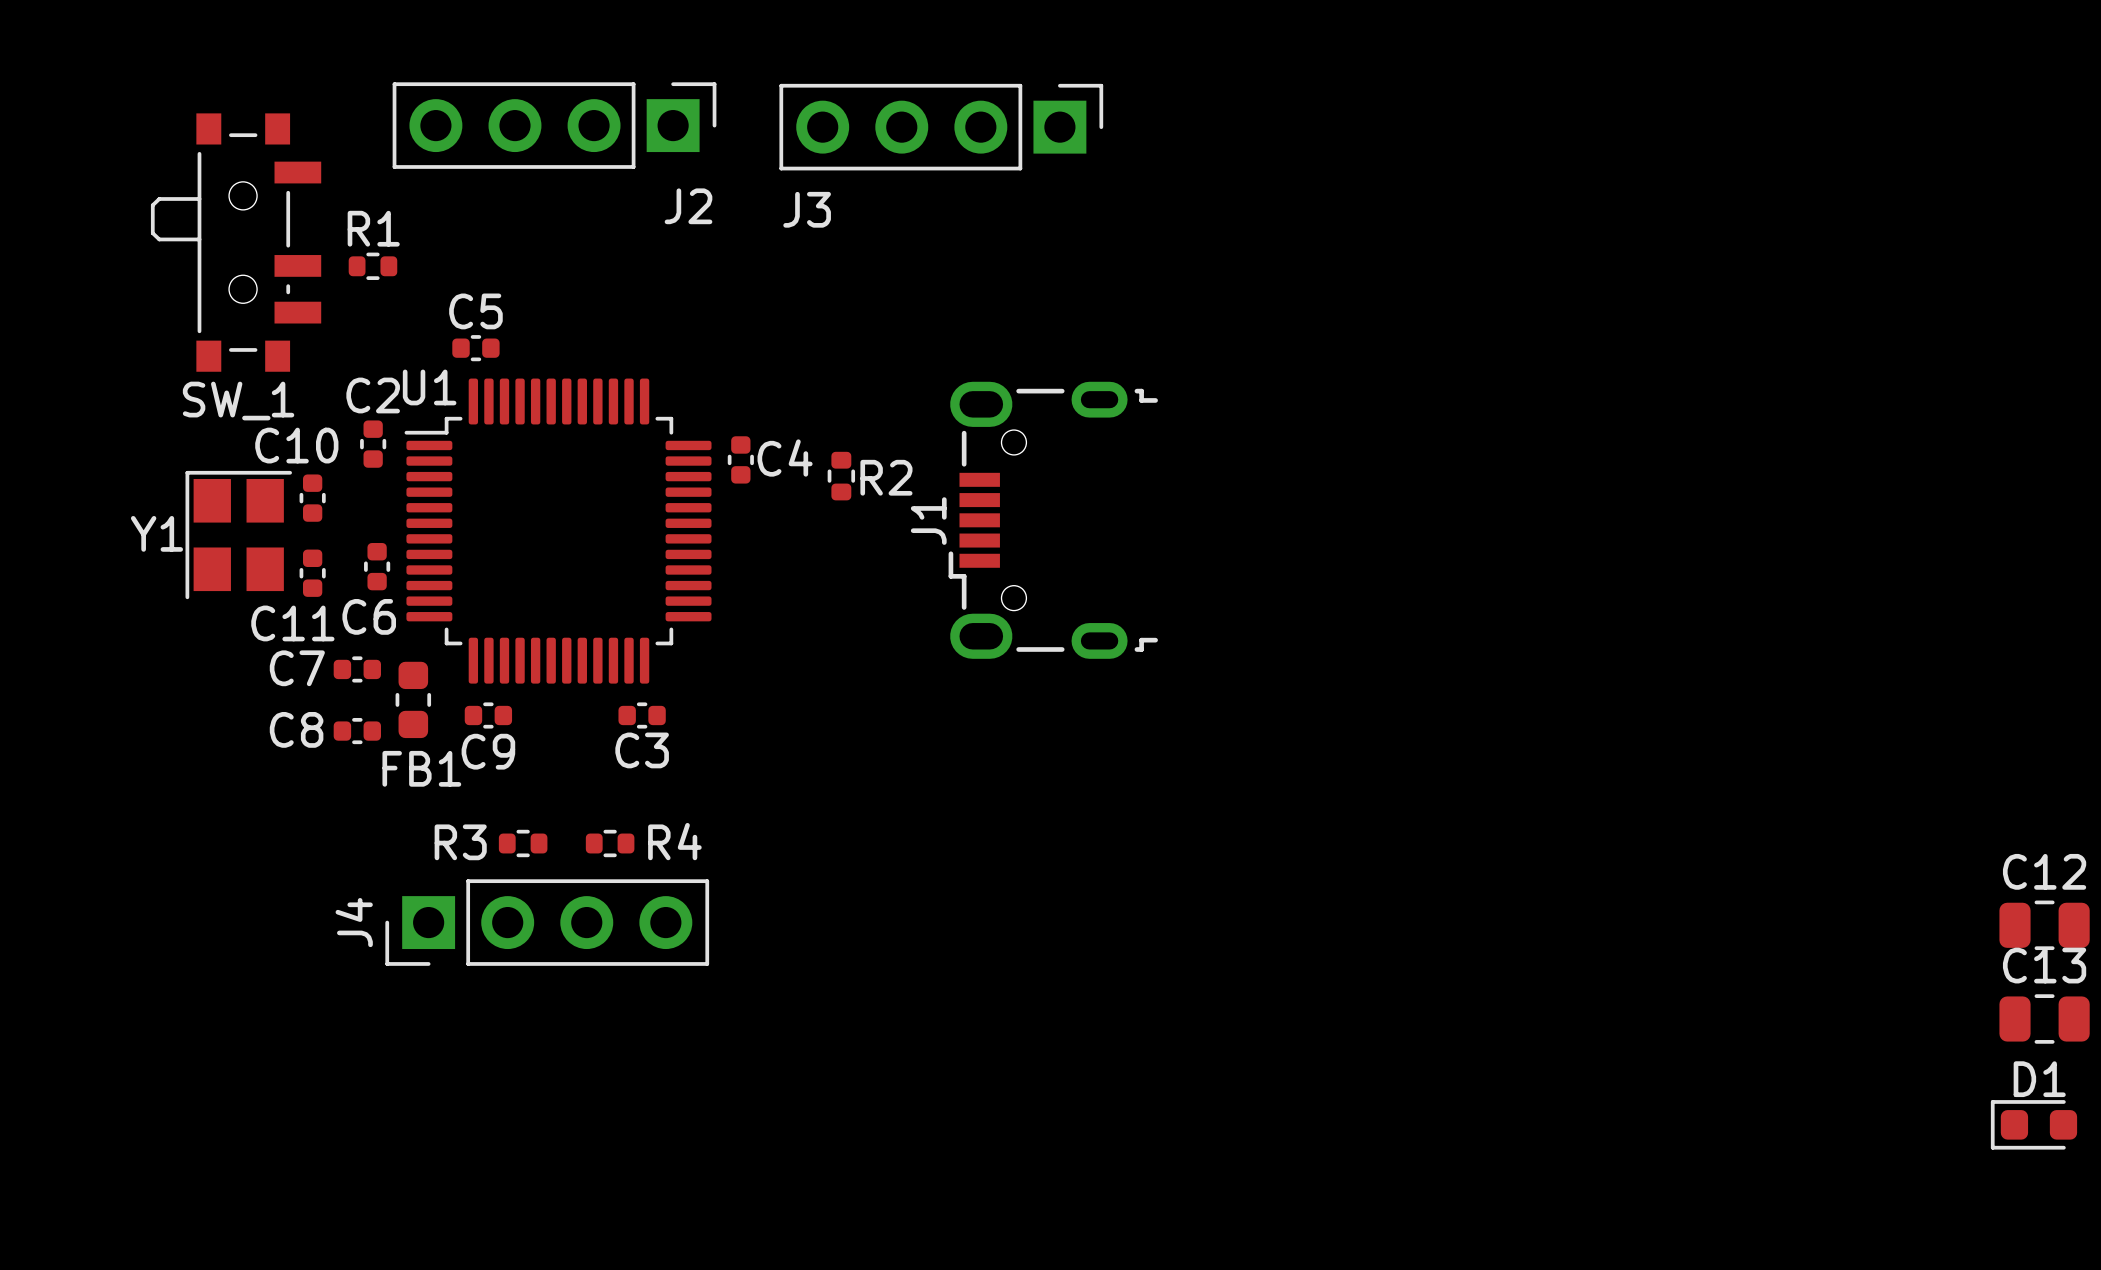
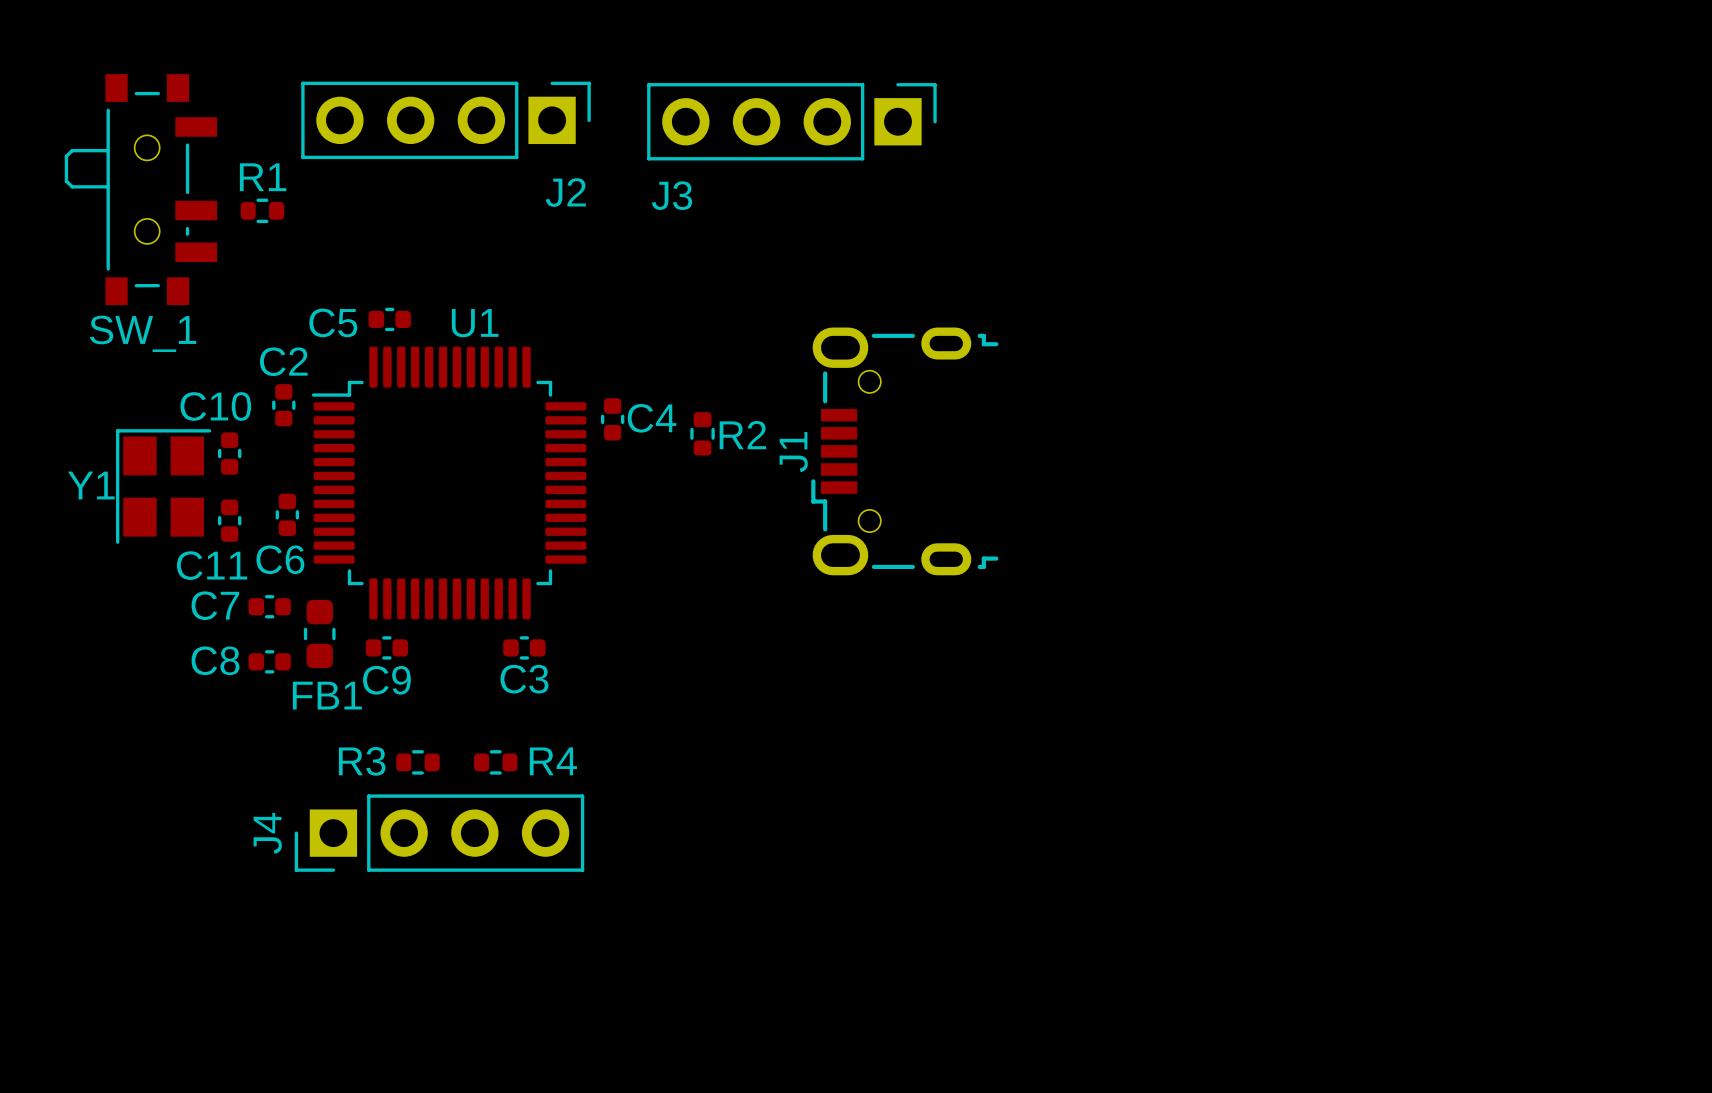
SW_1 position: (236, 242) -> (140, 189)
R1 position: (372, 266) -> (262, 210)
C5 name position: C5 (475, 311) -> C5 (333, 322)
C5 position: (475, 348) -> (389, 319)
U1 name position: U1 (429, 387) -> U1 (475, 323)
J1 position: (1053, 520) -> (904, 451)

